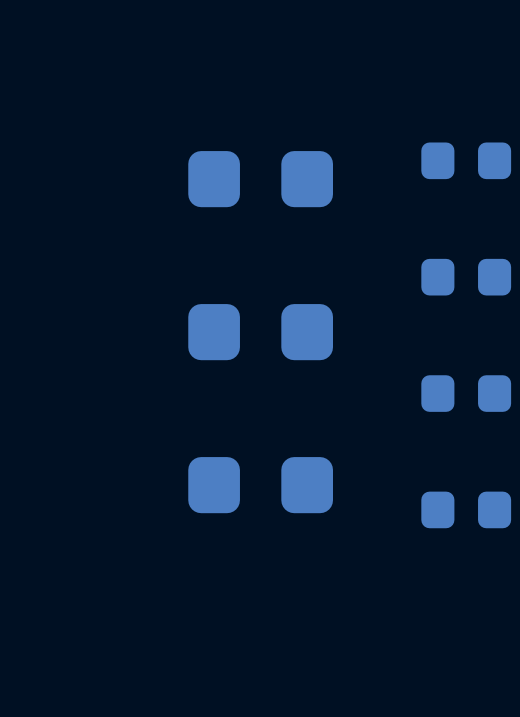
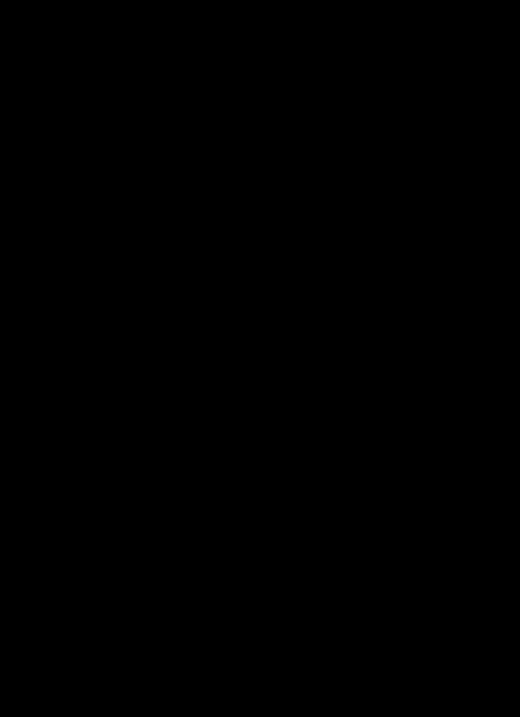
part: (466, 160) -> none
part: (260, 179) -> none
part: (466, 277) -> none
part: (260, 332) -> none
part: (466, 393) -> none
part: (260, 485) -> none
part: (466, 509) -> none

